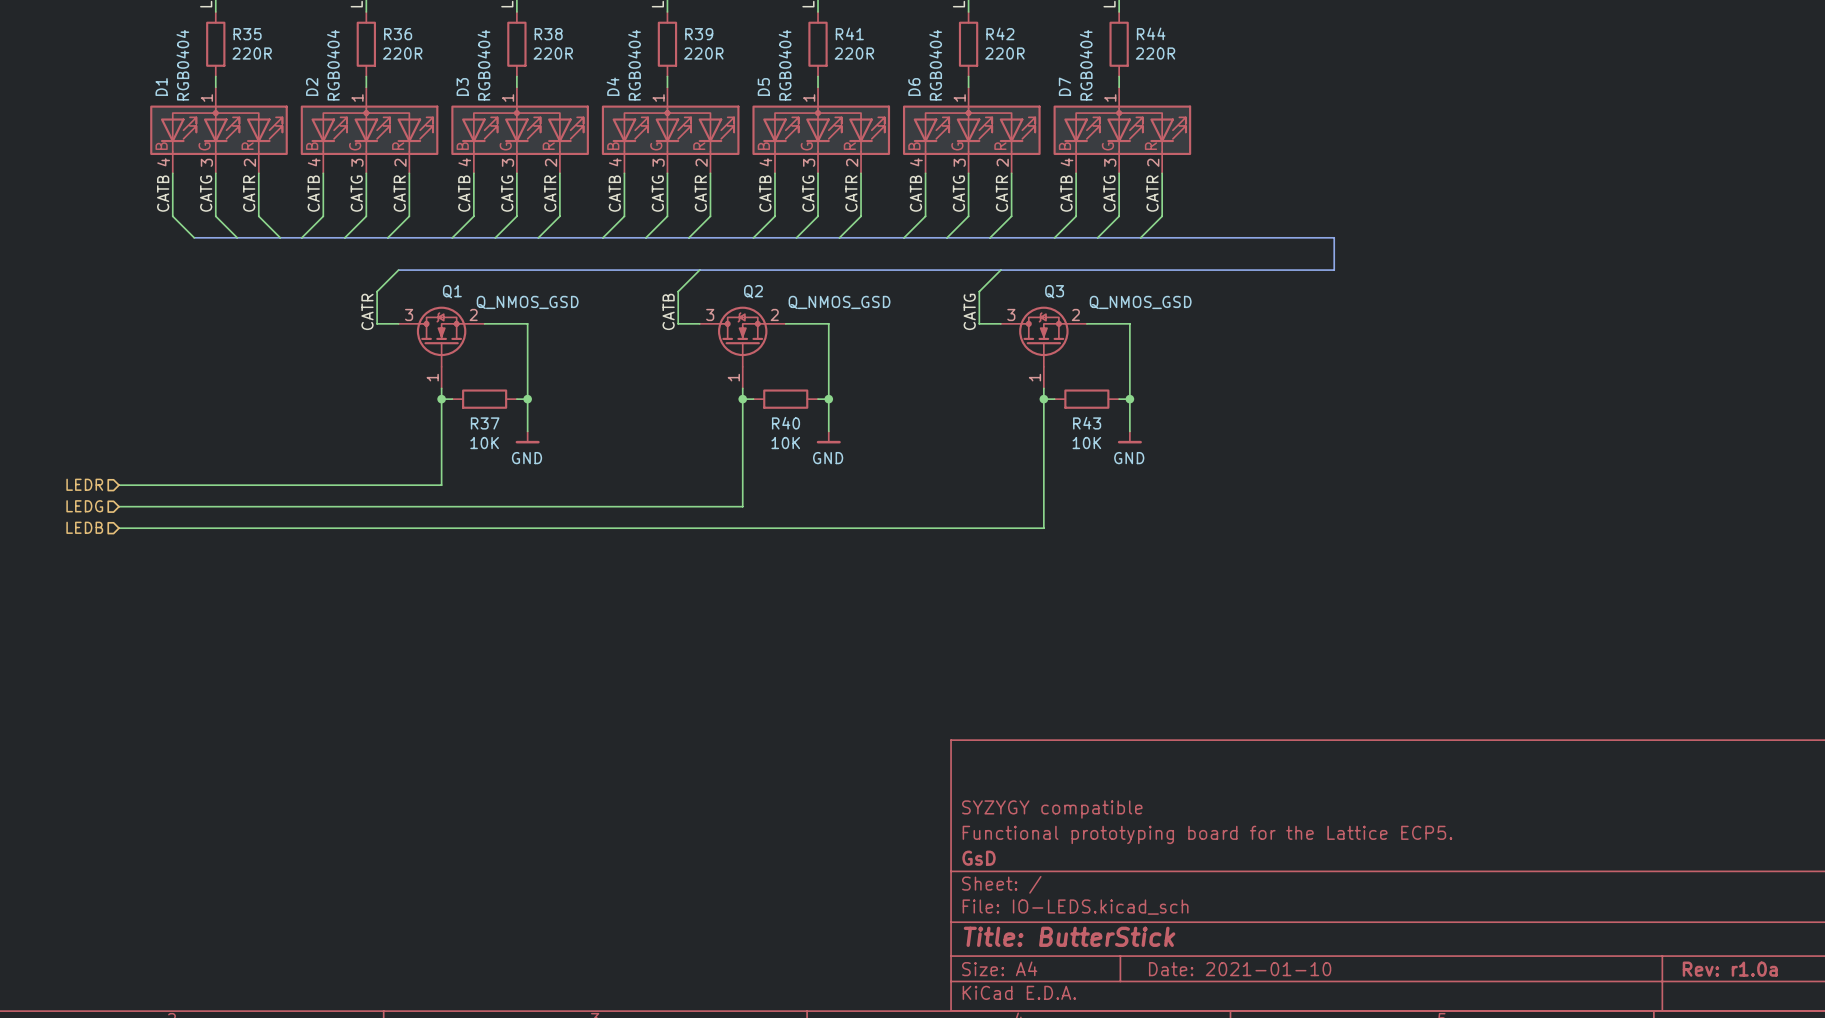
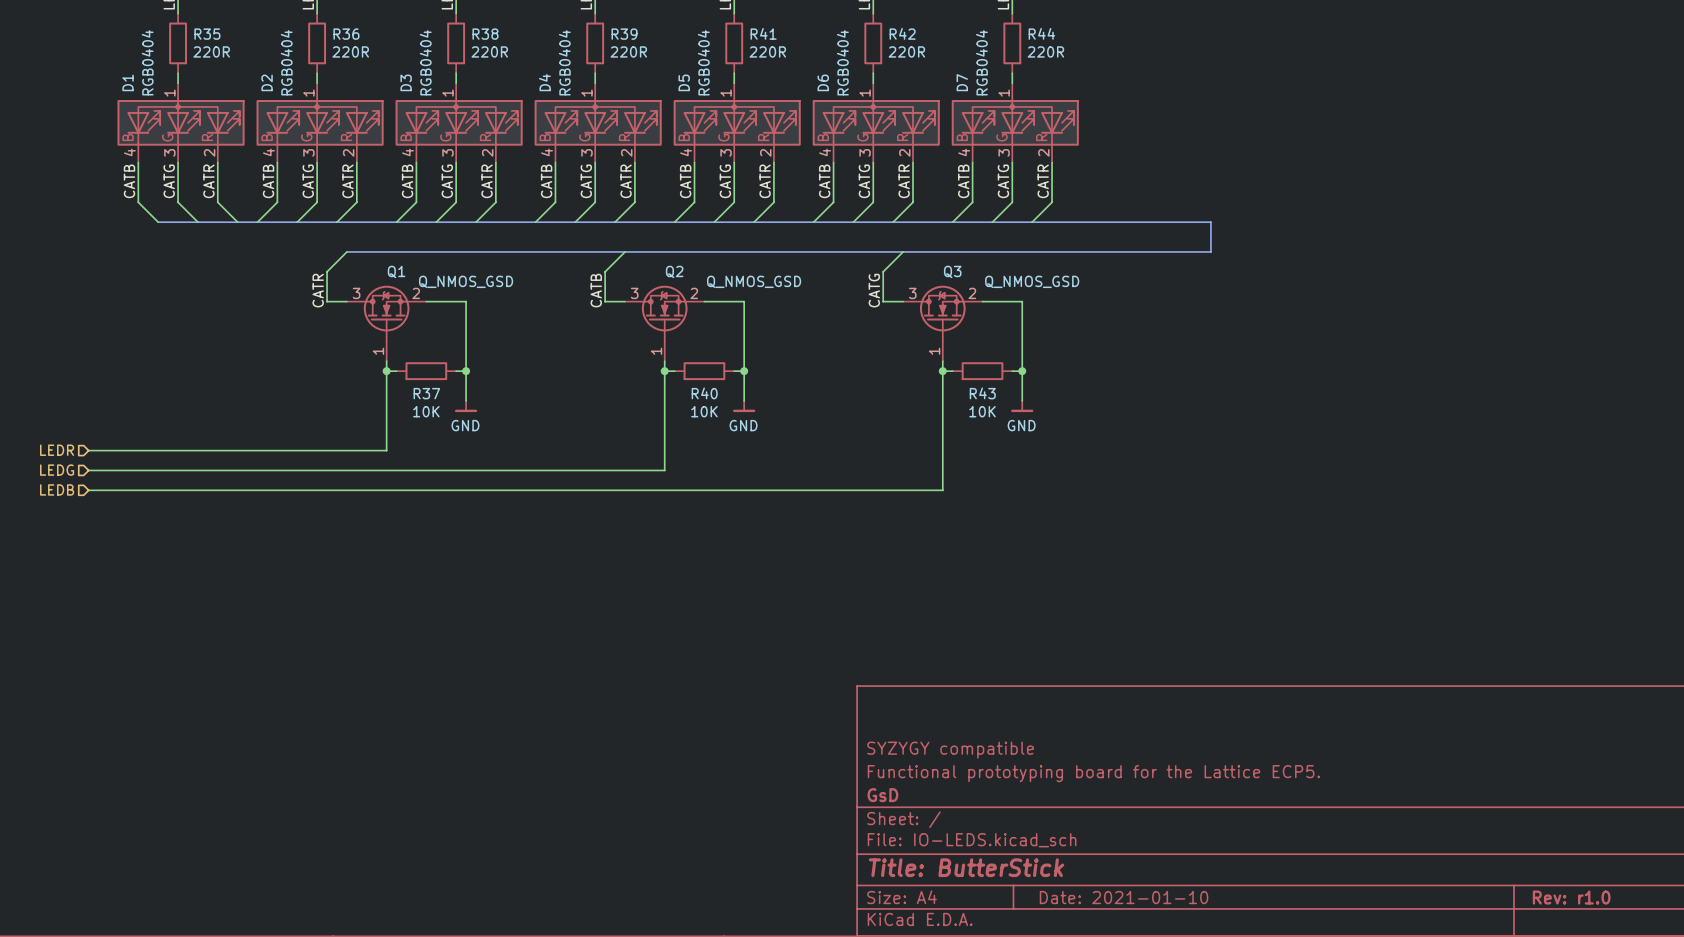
title block: Rev: r1.0a (1730, 969) -> Rev: r1.0 (1571, 897)

